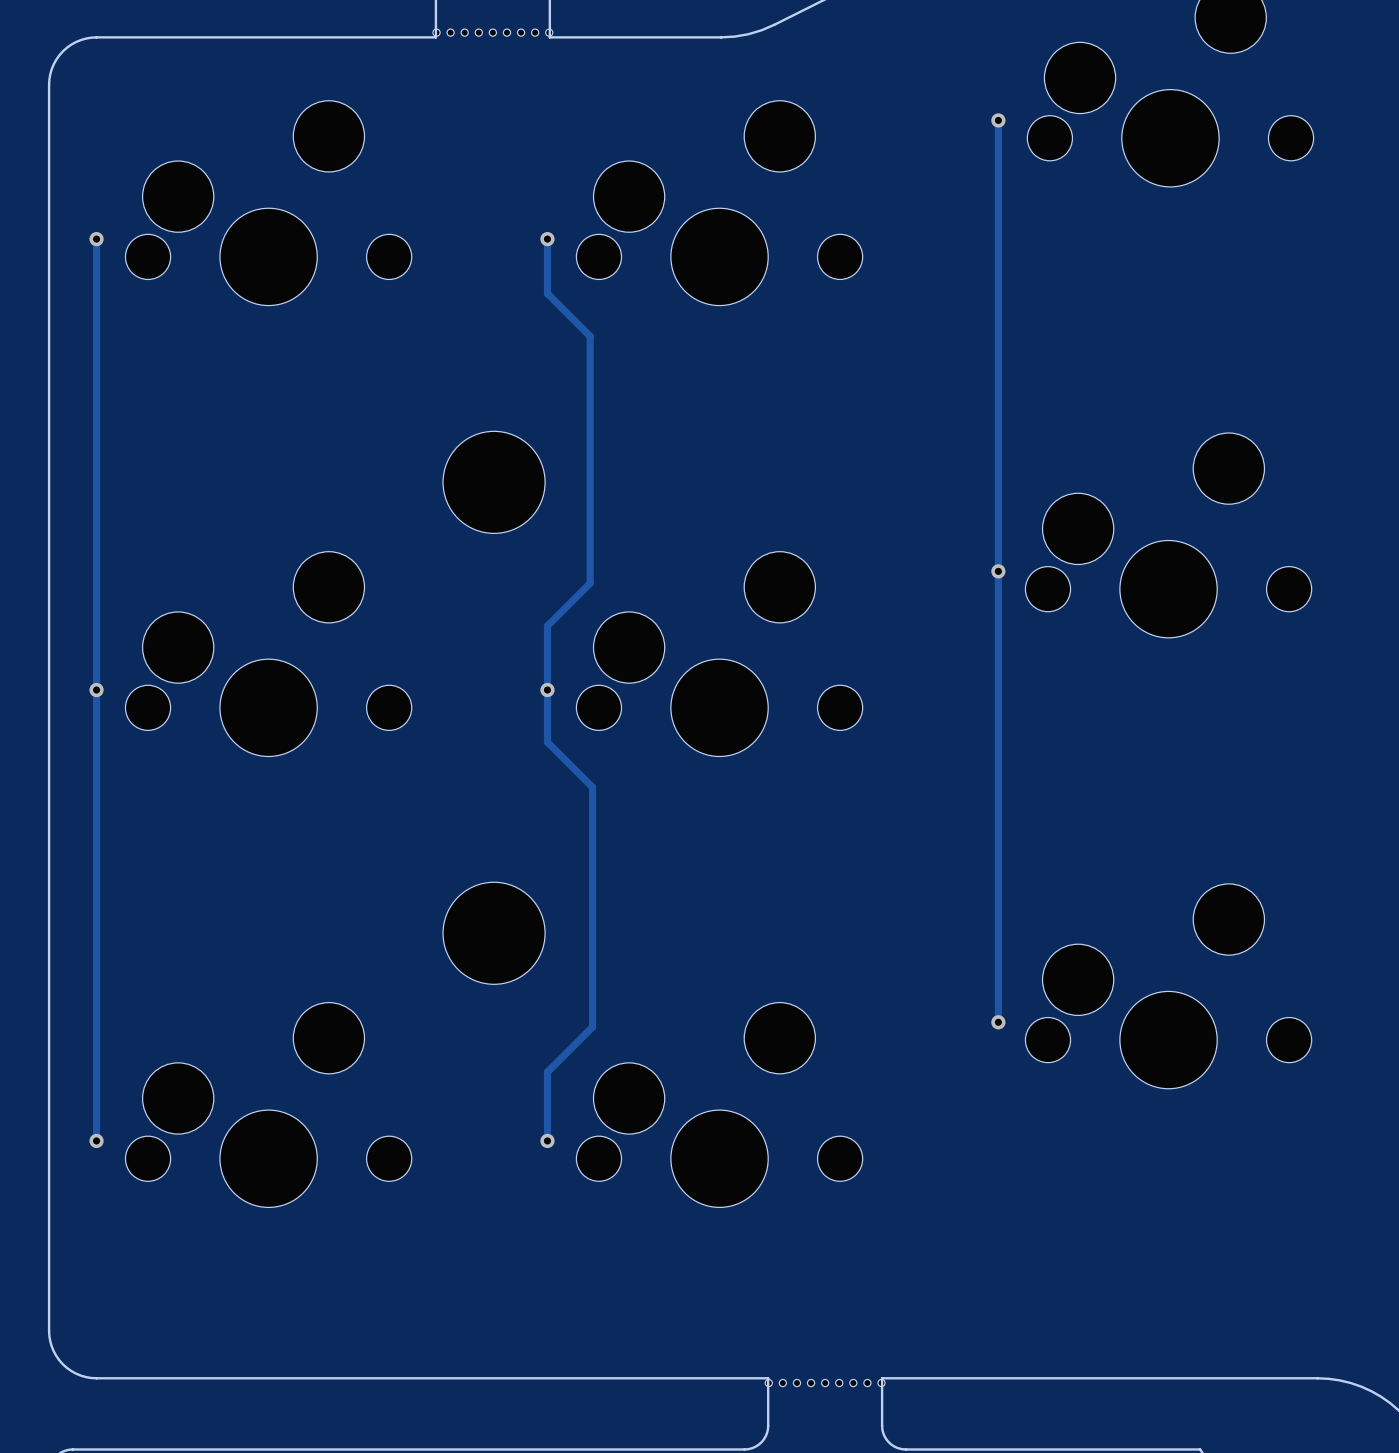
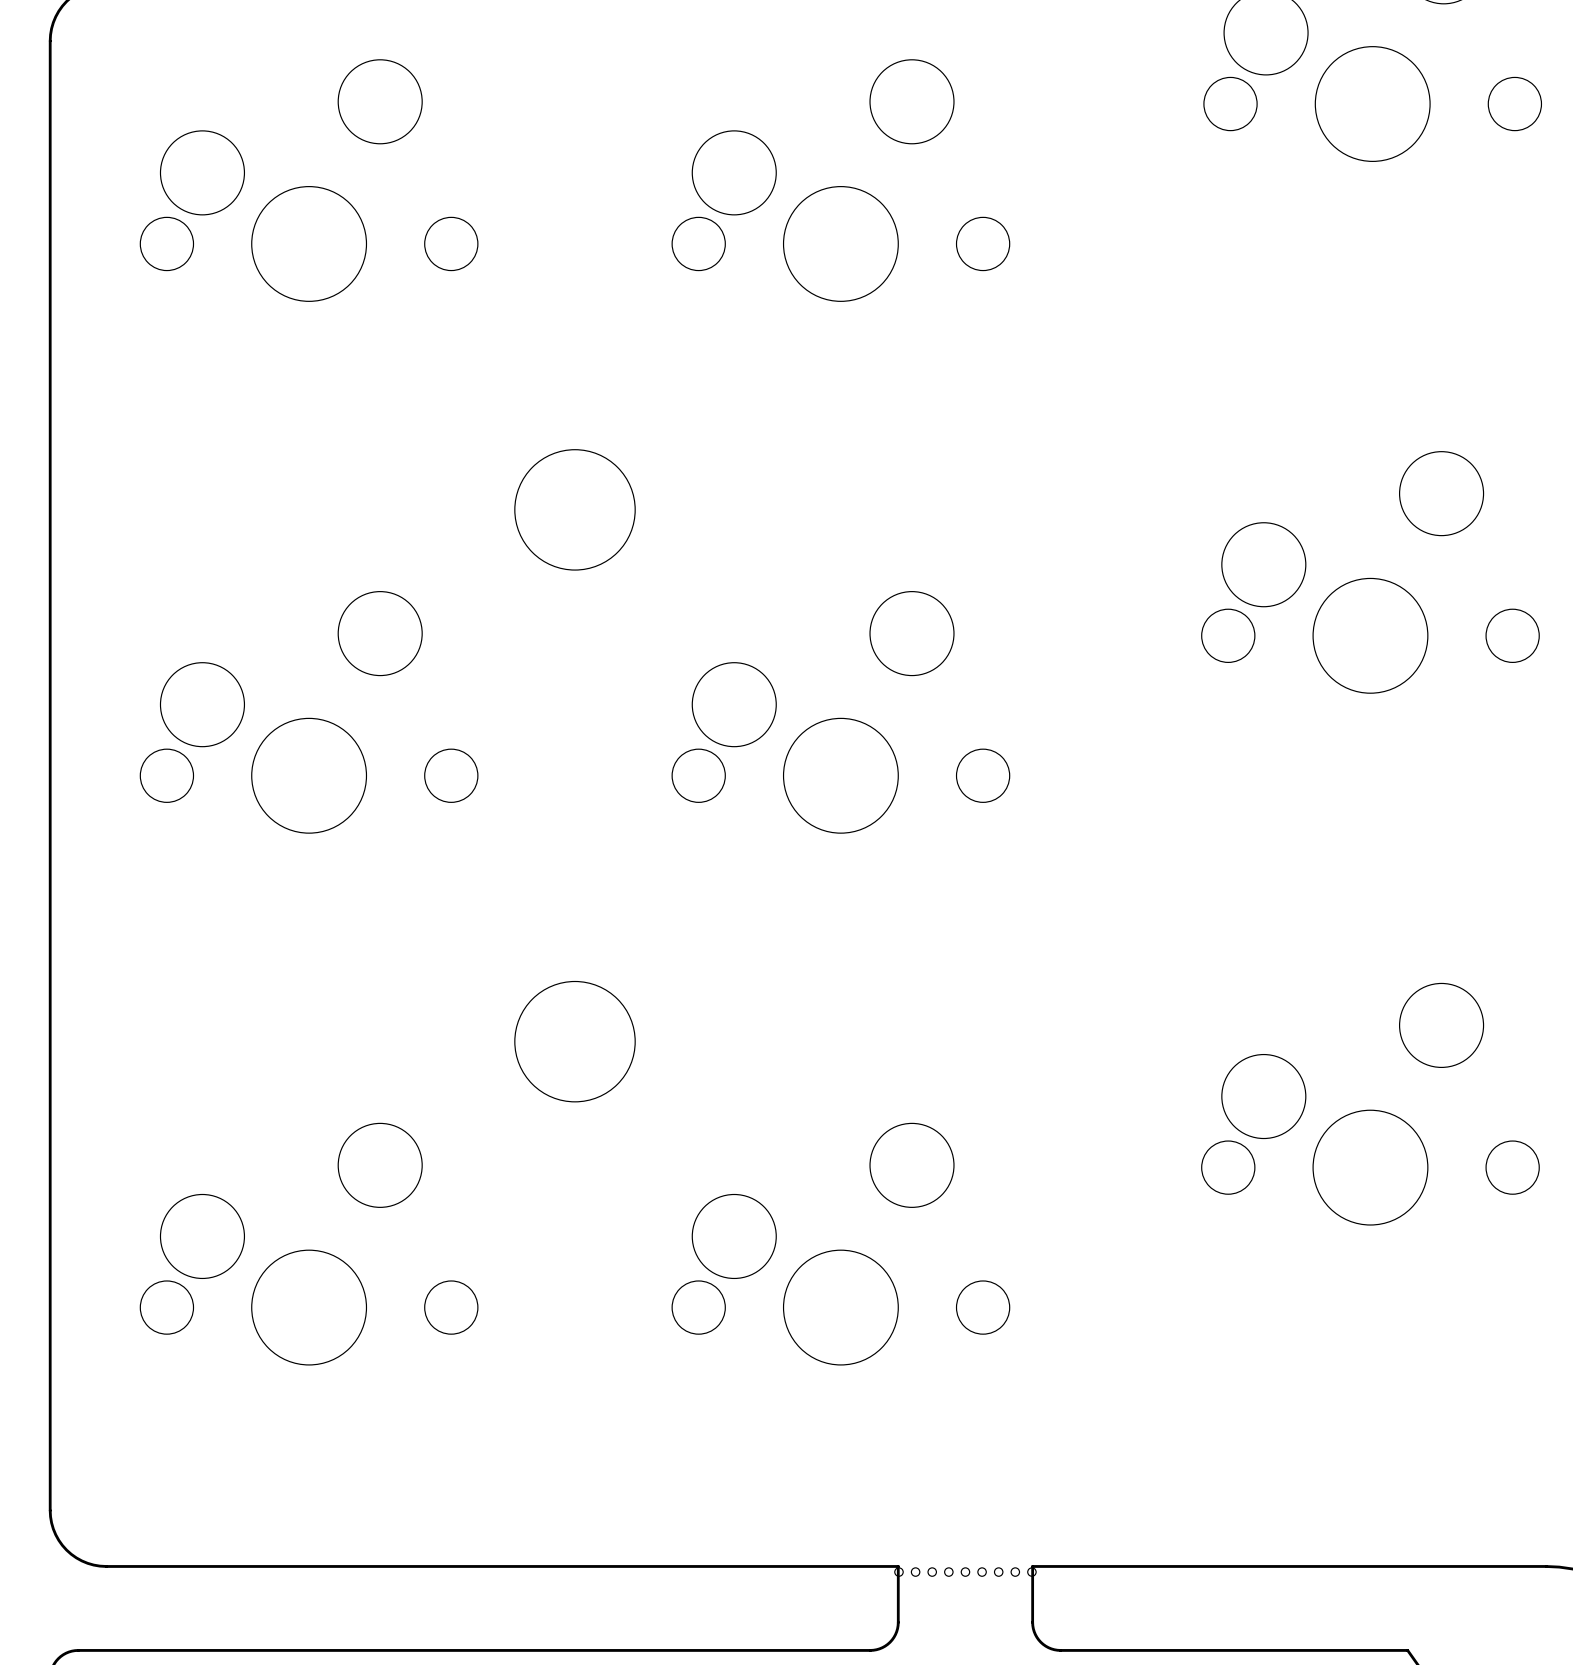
track: (998, 120) (998, 1022) -> none
via: (998, 120) -> none
track: (96, 239) (96, 1140) -> none
via: (96, 239) -> none
track: (547, 239) (547, 293) (590, 336) (590, 583) (547, 625) (547, 742) (592, 787) (592, 1027) (547, 1072) (547, 1140) -> none
via: (547, 239) -> none
via: (998, 571) -> none
via: (96, 690) -> none
via: (547, 690) -> none
via: (998, 1022) -> none
via: (96, 1140) -> none
via: (547, 1140) -> none

